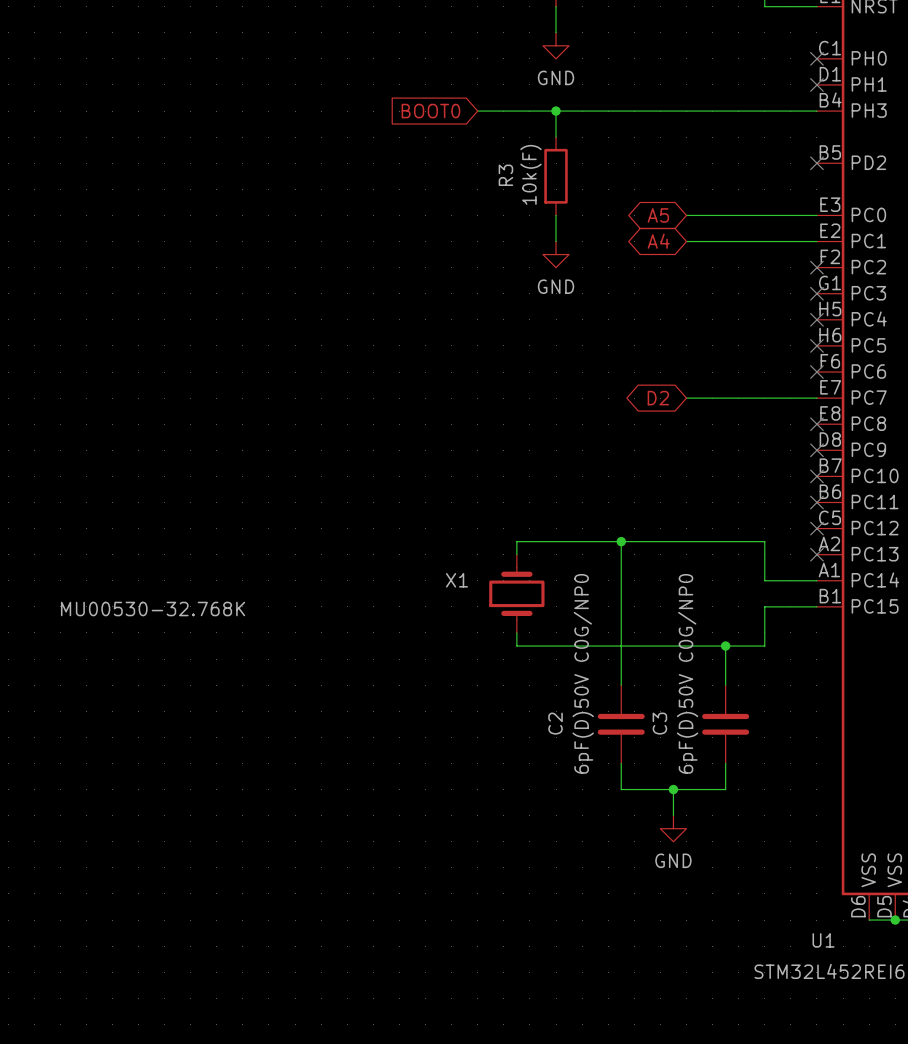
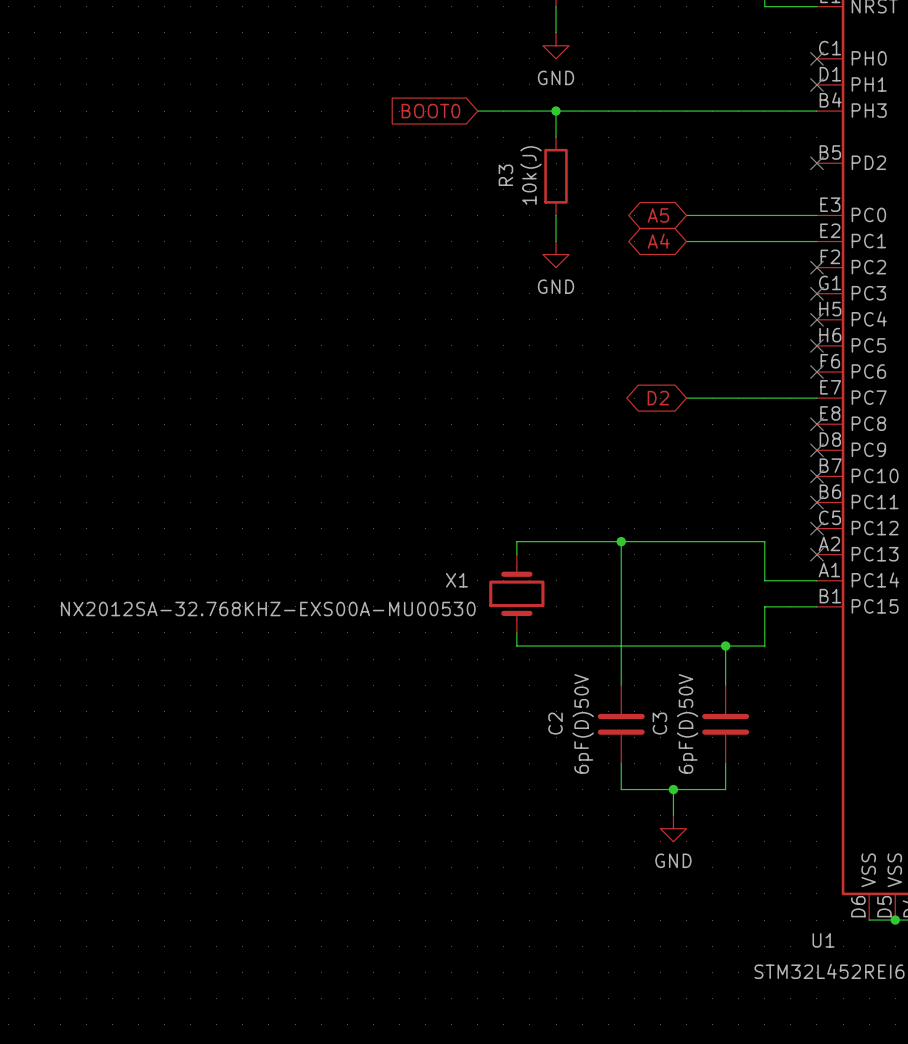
R3 value: 10k(F) (530, 174) -> 10k(J) (530, 175)
X1 value: MU00530-32.768K (153, 609) -> NX2012SA-32.768KHZ-EXS00A-MU00530 (268, 609)
C2 value: 6pF(D)50V C0G/NP0 (583, 673) -> 6pF(D)50V (583, 723)
C3 value: 6pF(D)50V C0G/NP0 (687, 673) -> 6pF(D)50V (687, 723)

